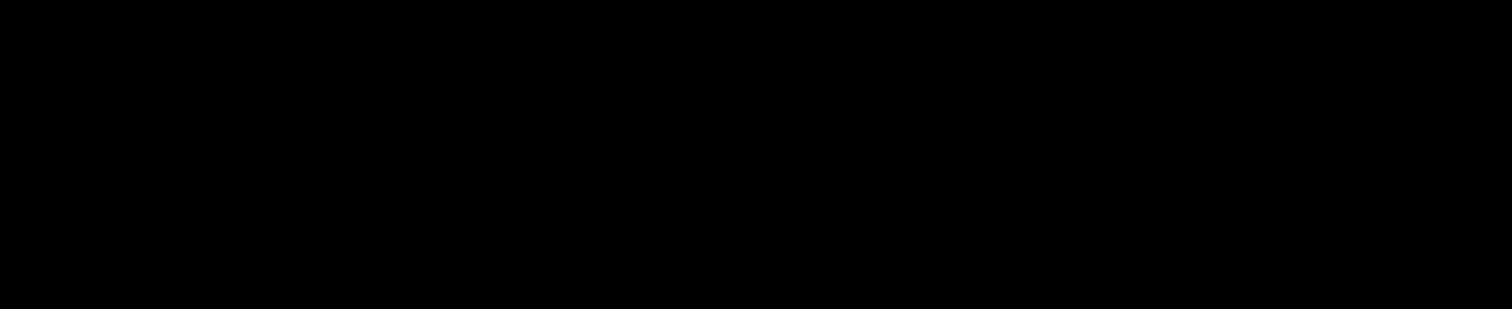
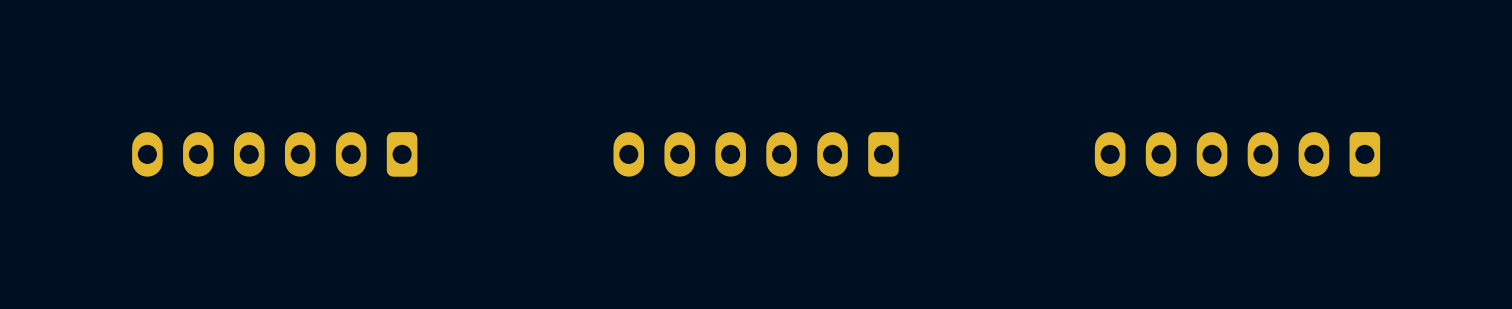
part: none -> (274, 154)
part: none -> (756, 154)
part: none -> (1237, 154)

